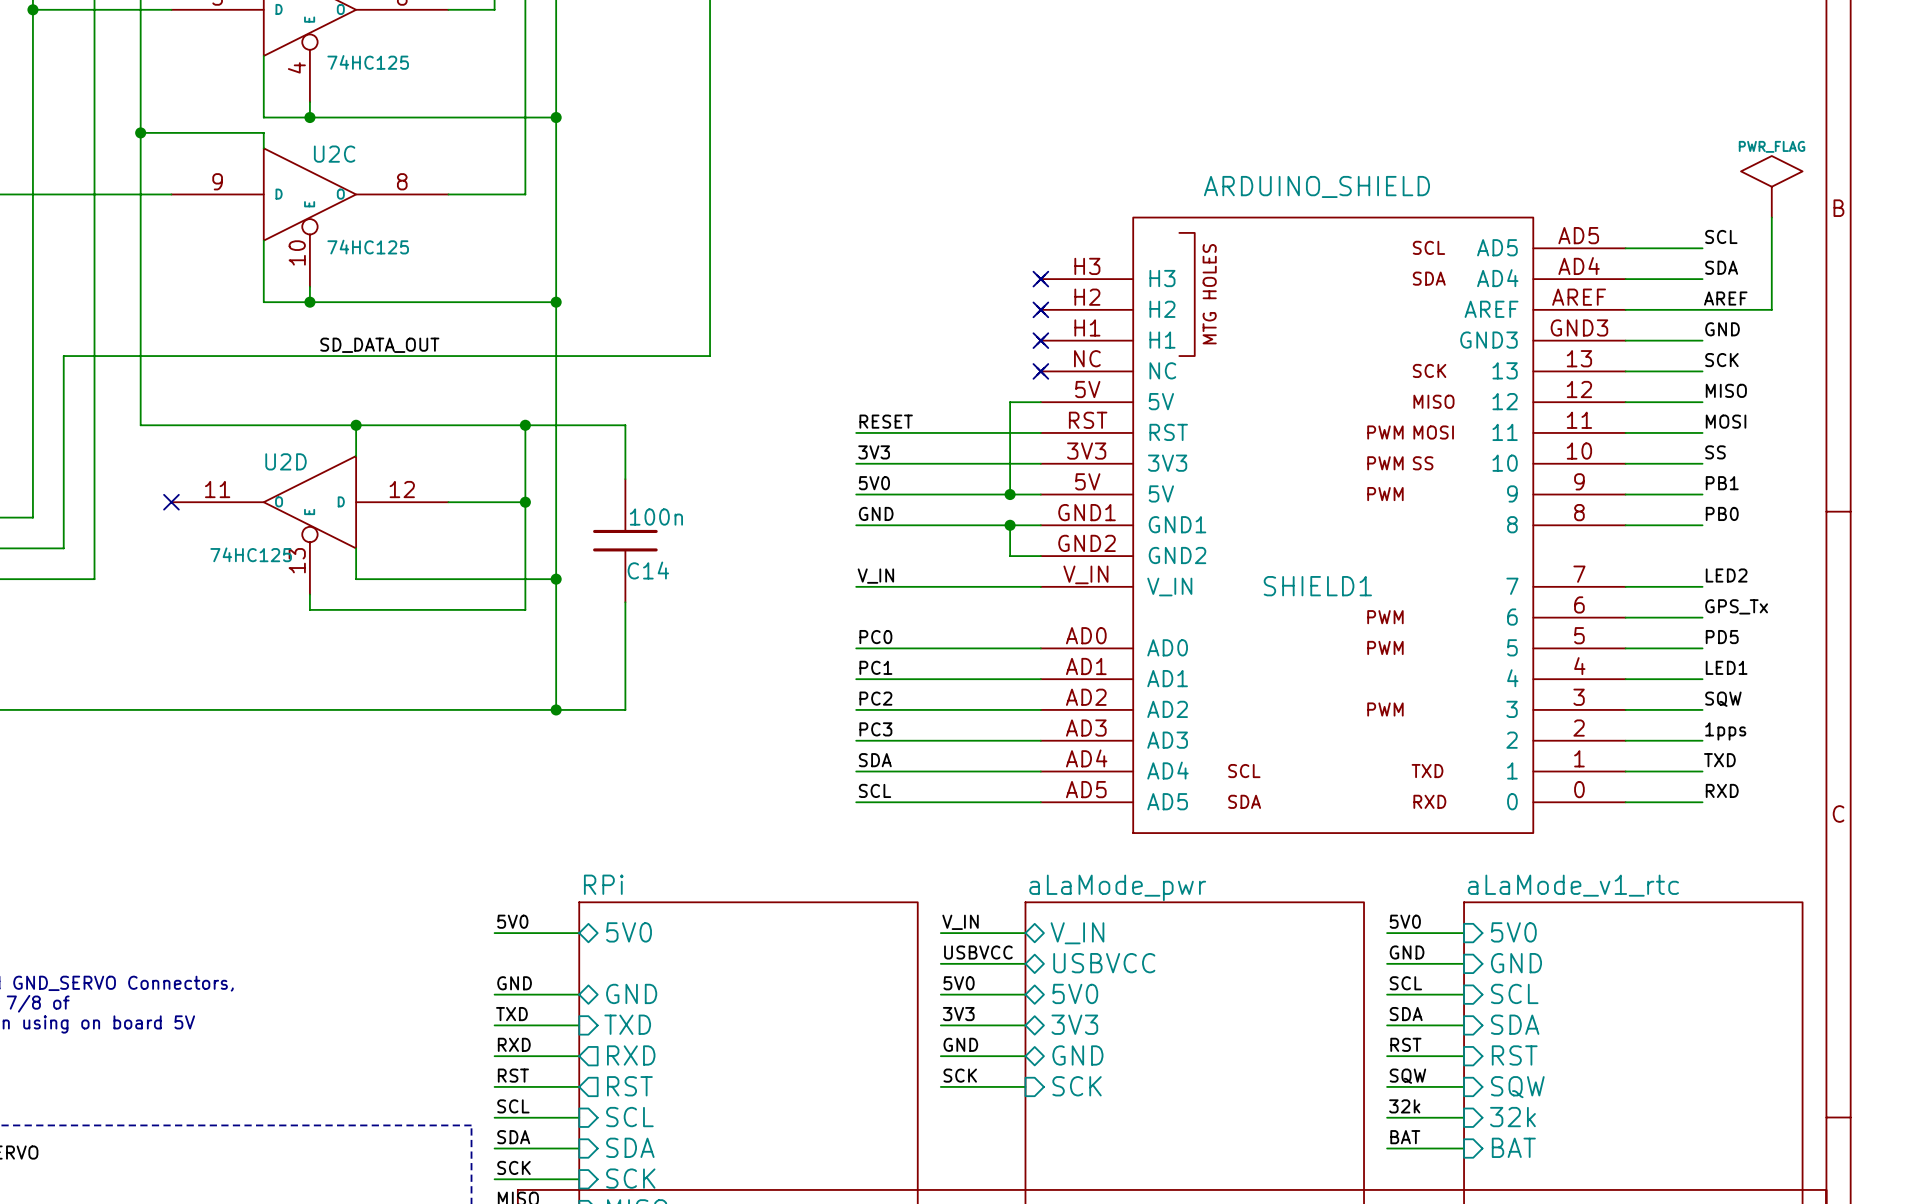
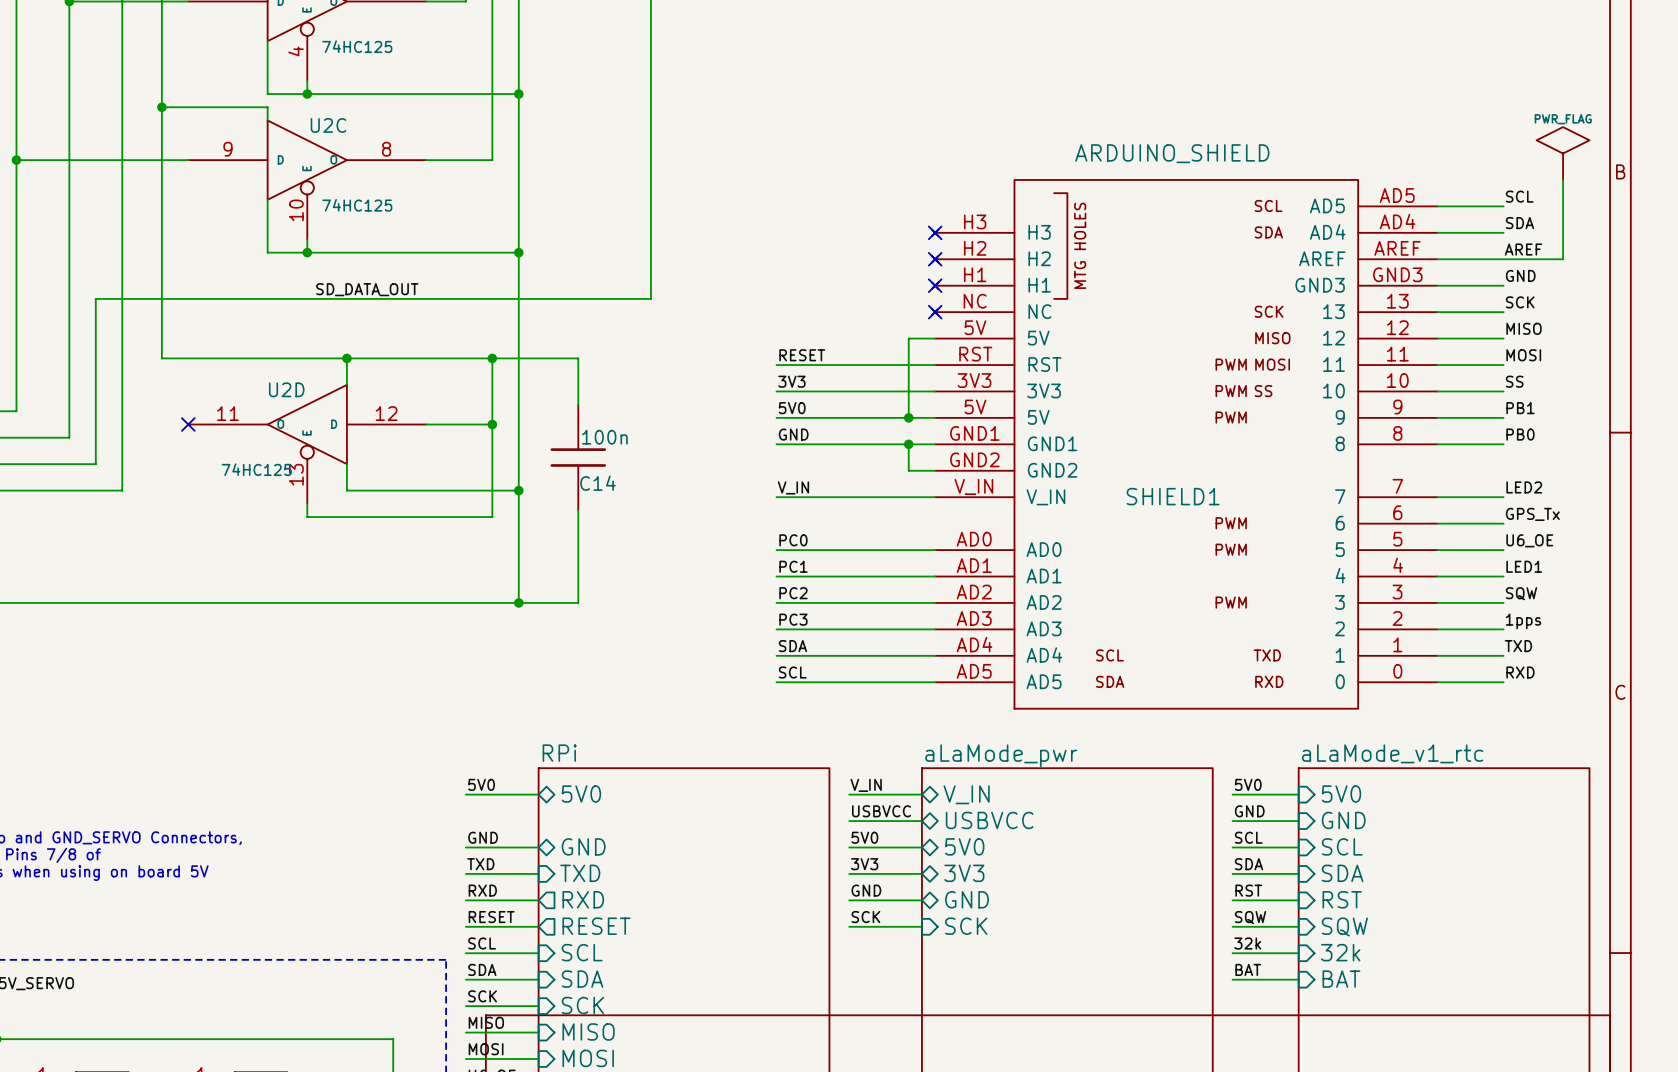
label: PD5 (1722, 637) -> U6_OE (1529, 540)
label: RST (513, 1075) -> RESET (491, 917)
sheet pin: RST (629, 1086) -> RESET (596, 926)

